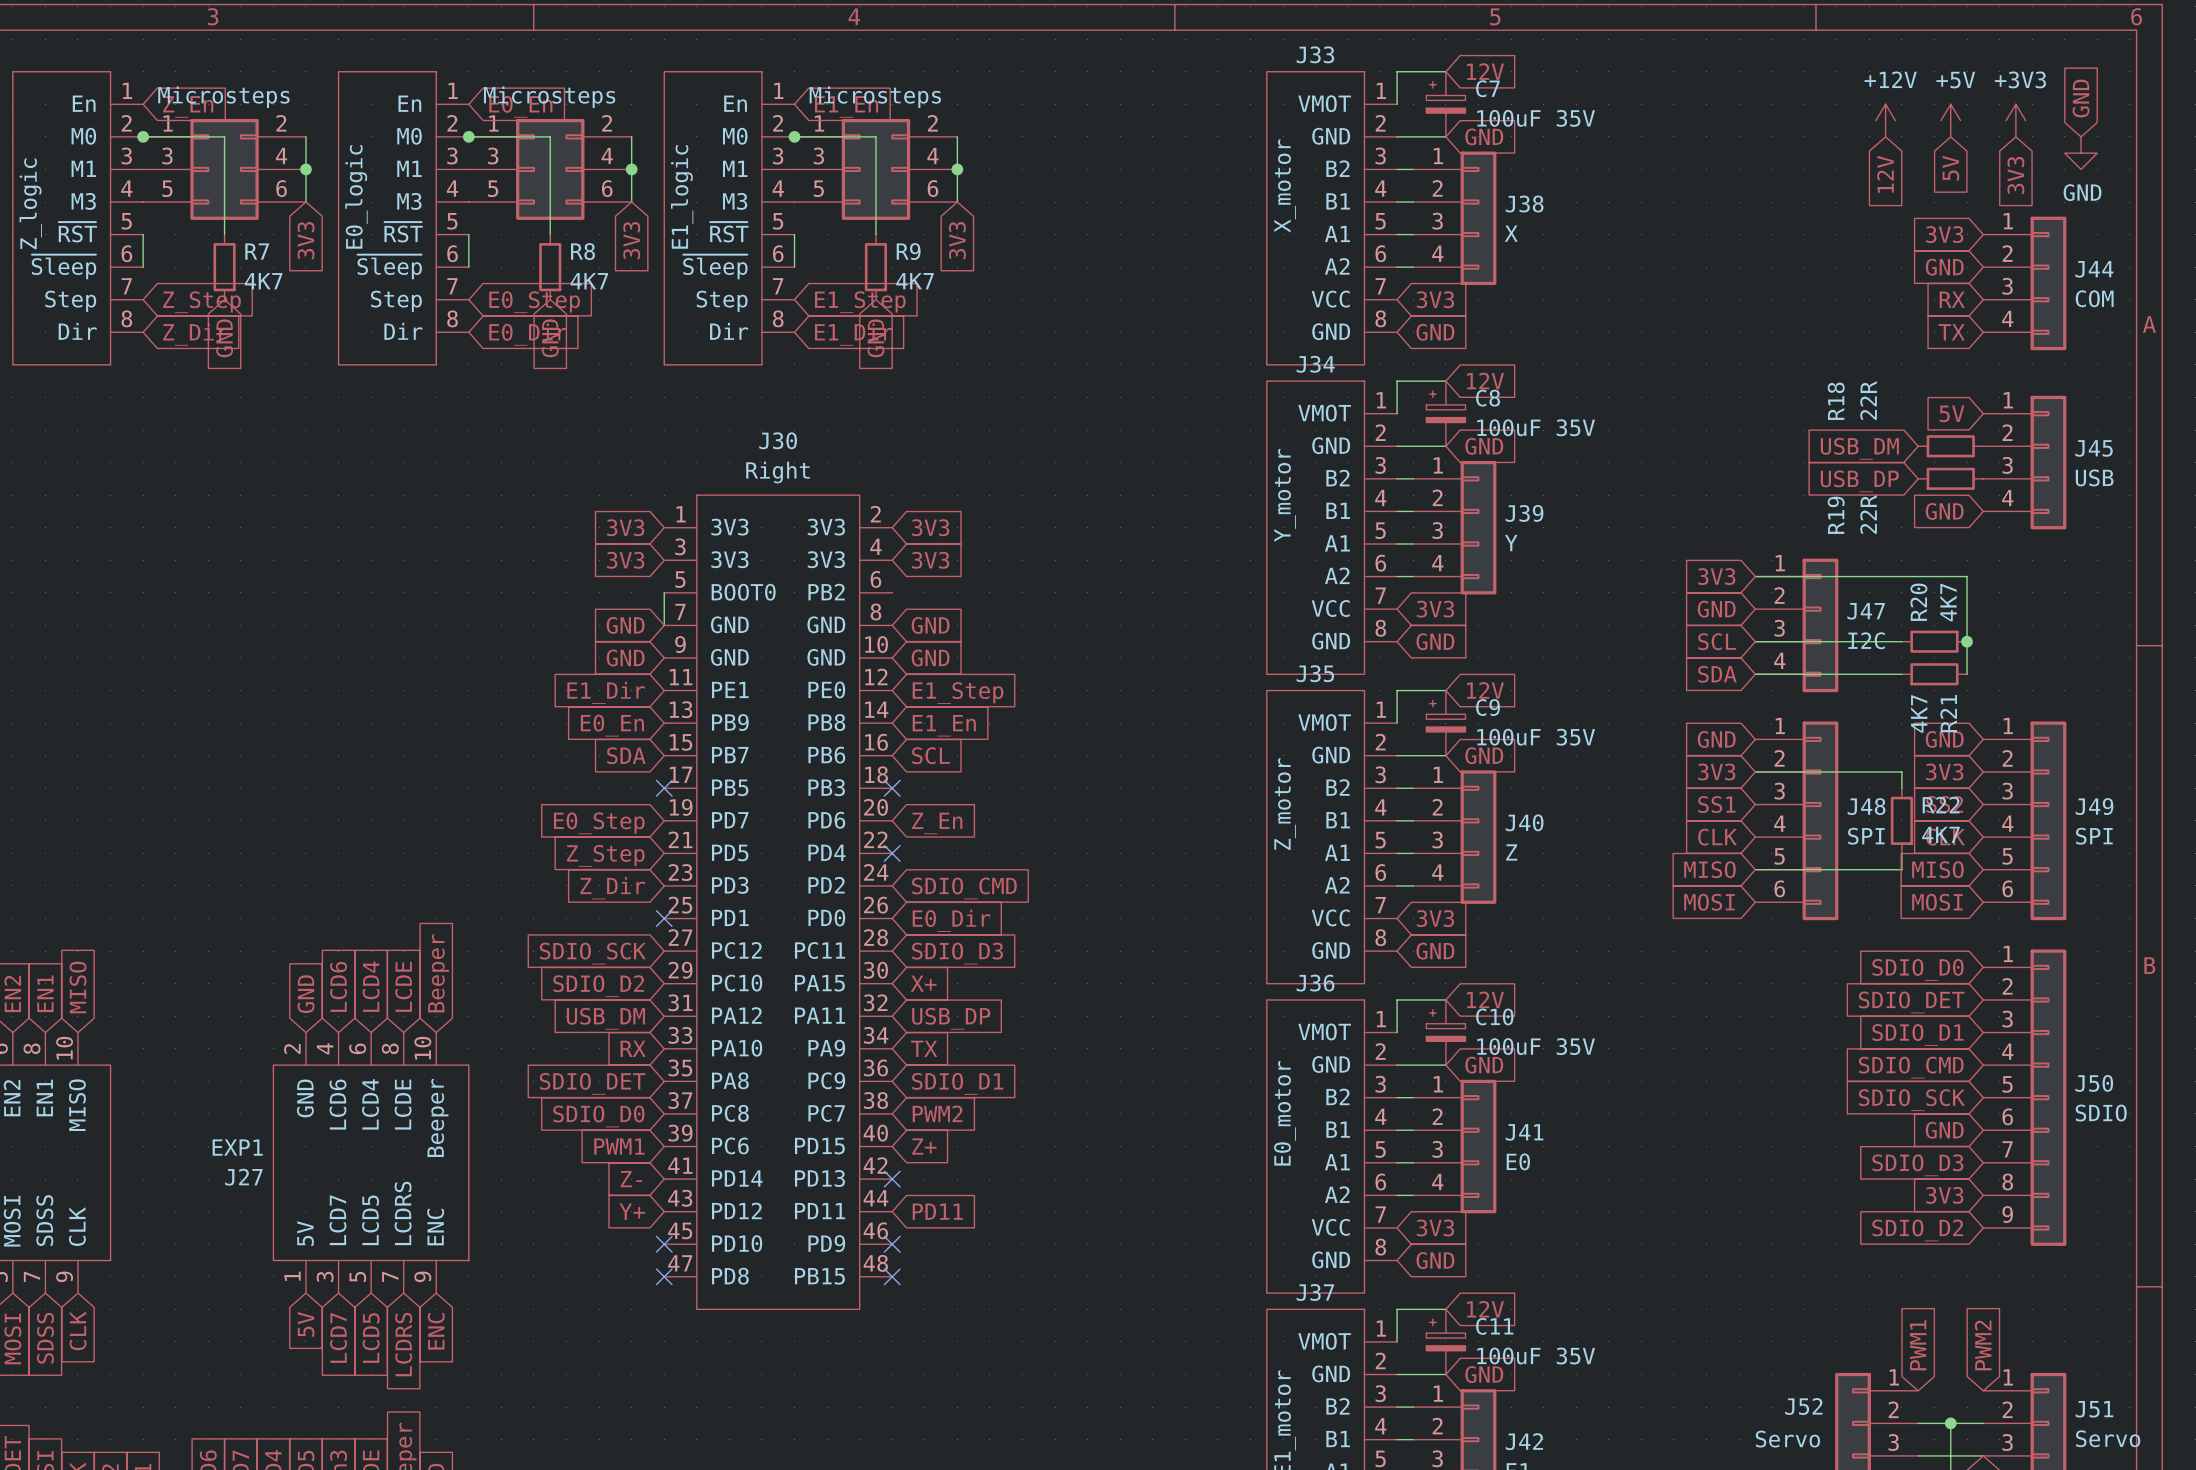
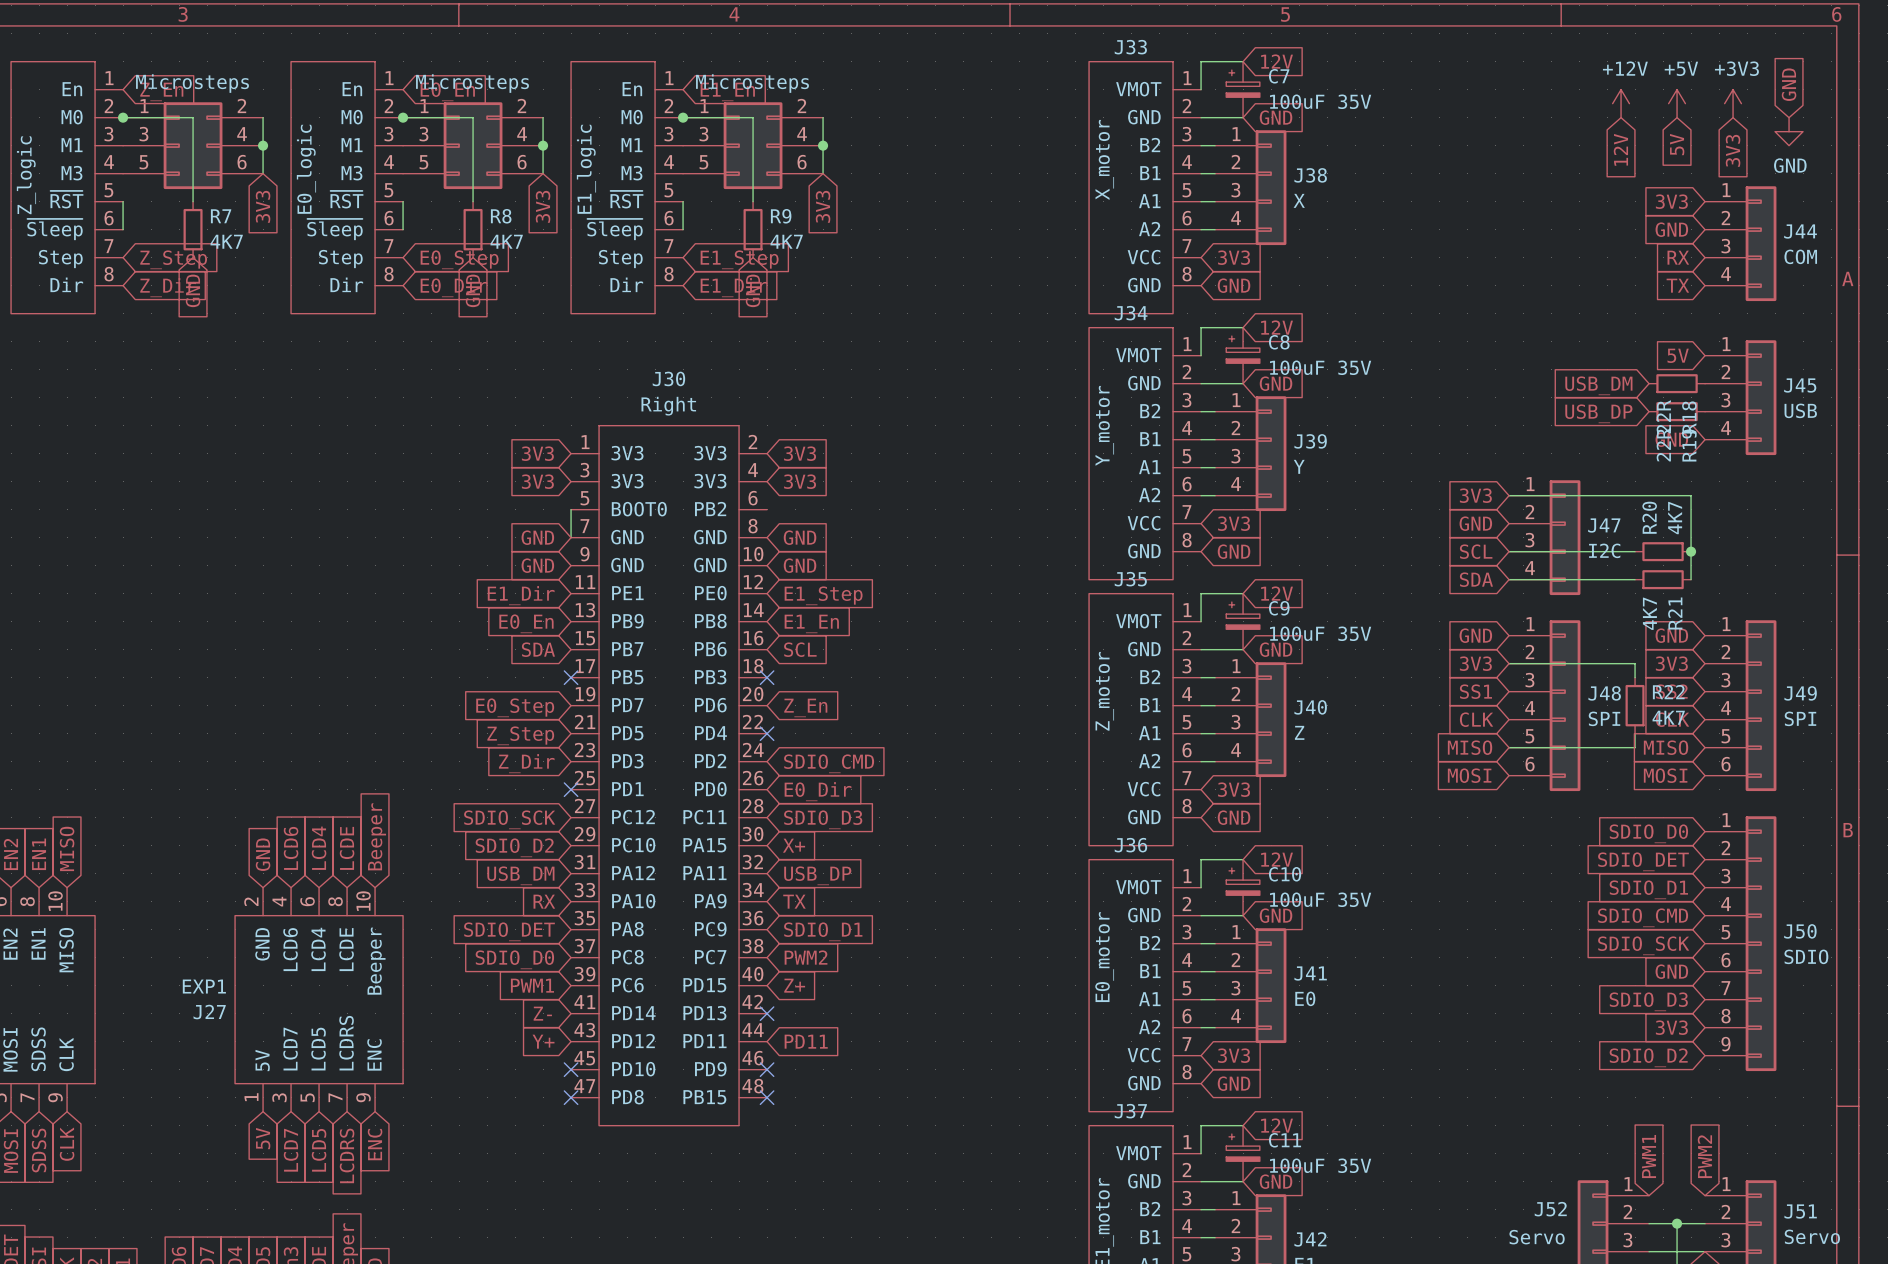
R18 value position: 22R (1868, 400) -> 22R (1663, 416)
R18 name position: R18 (1836, 401) -> R18 (1689, 417)
R19 value position: 22R (1868, 514) -> 22R (1663, 444)
R19 name position: R19 (1836, 515) -> R19 (1689, 445)

